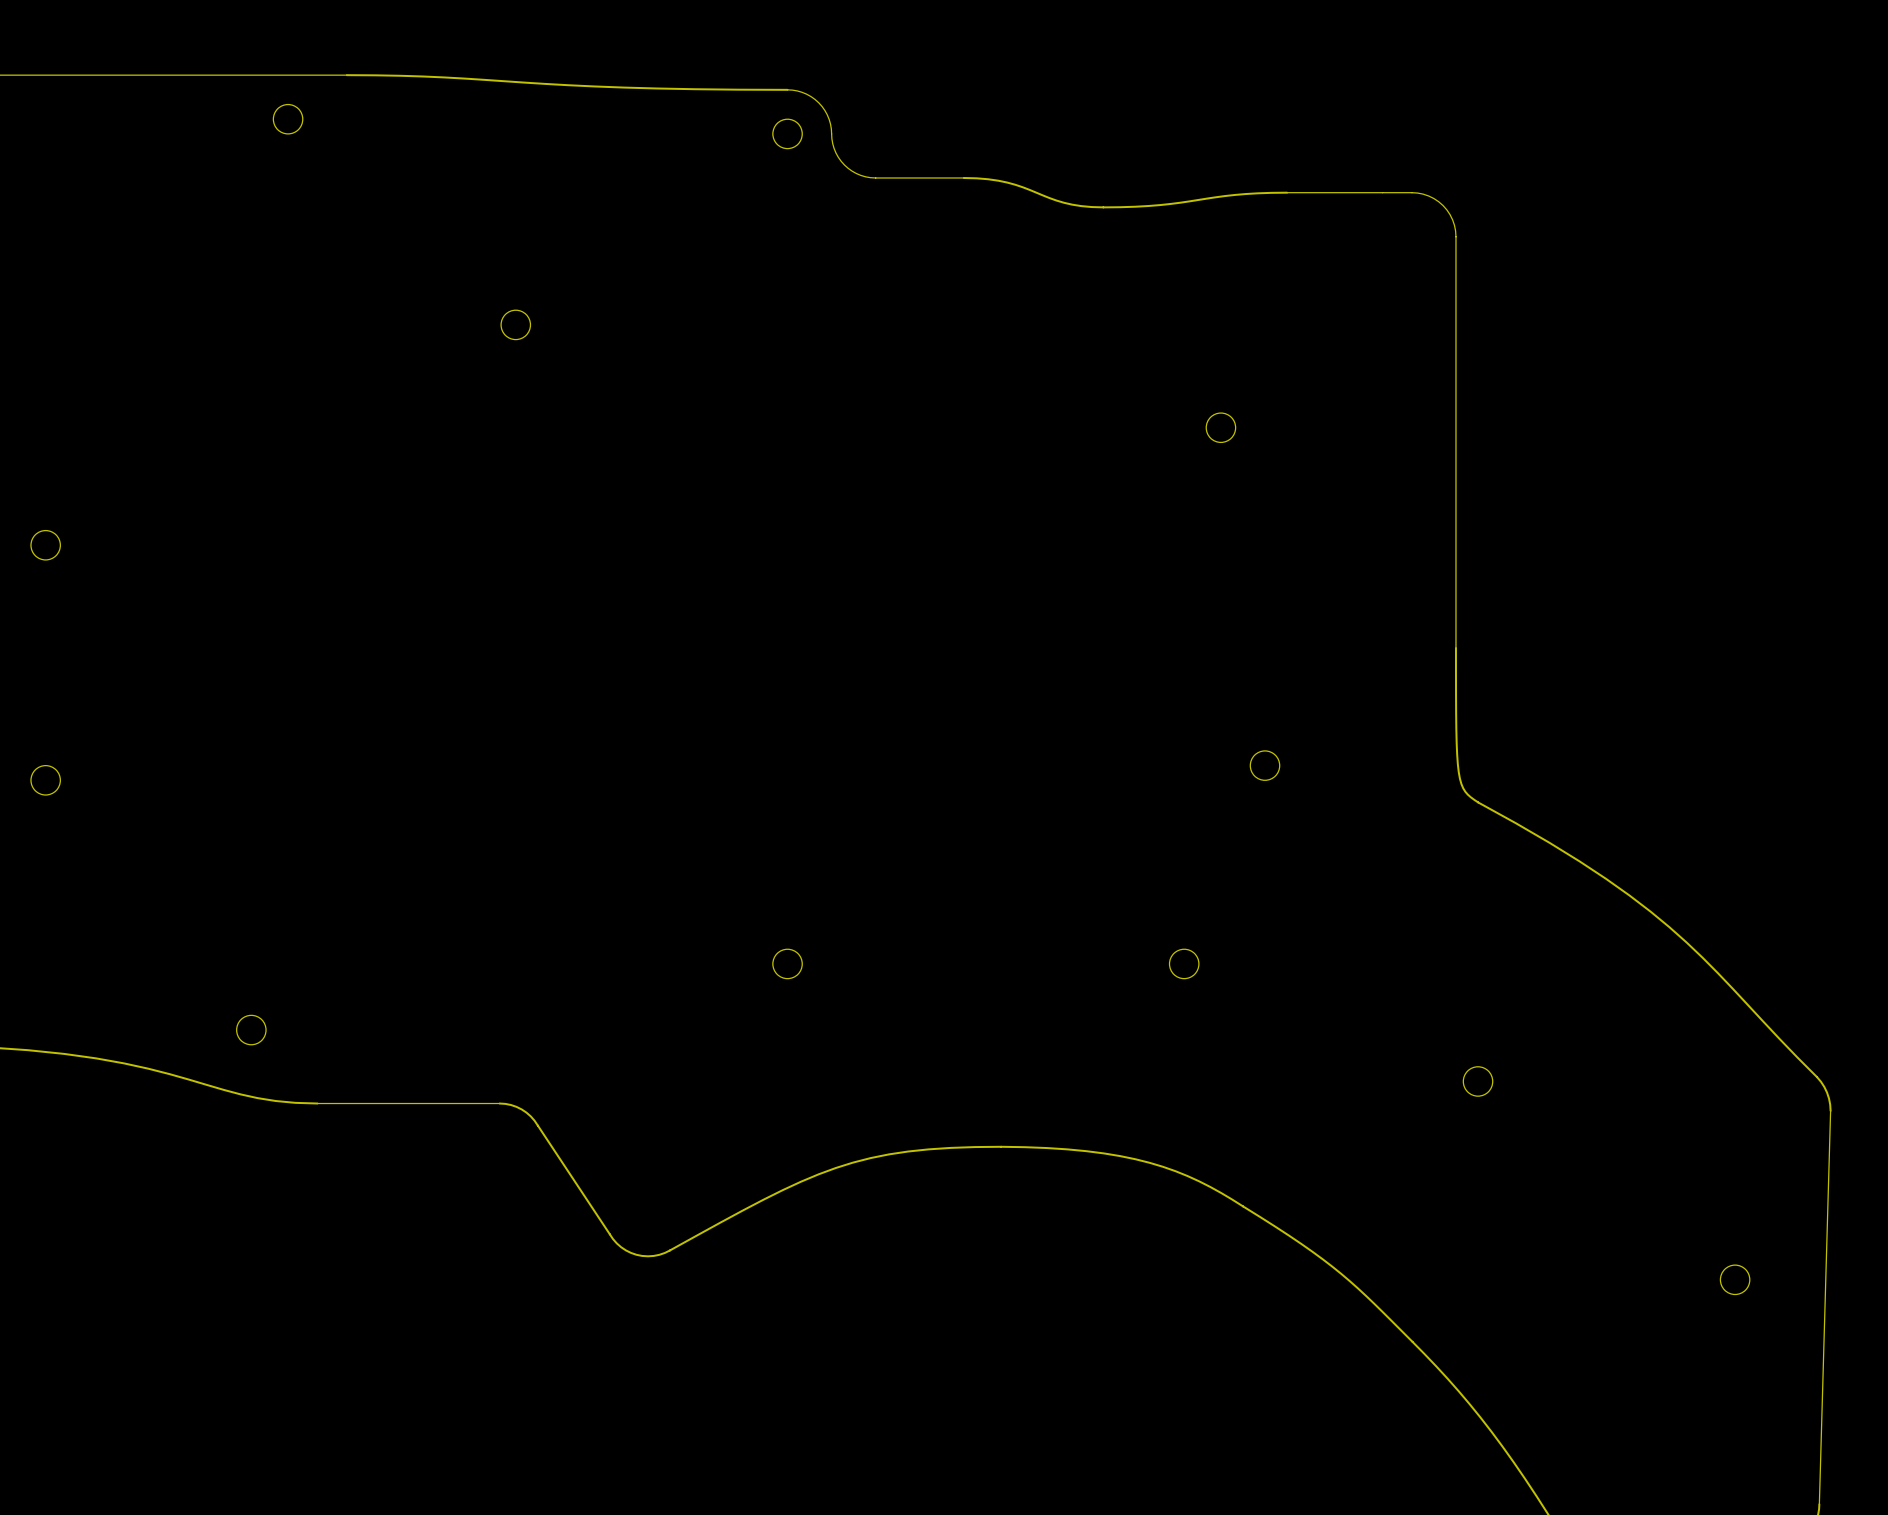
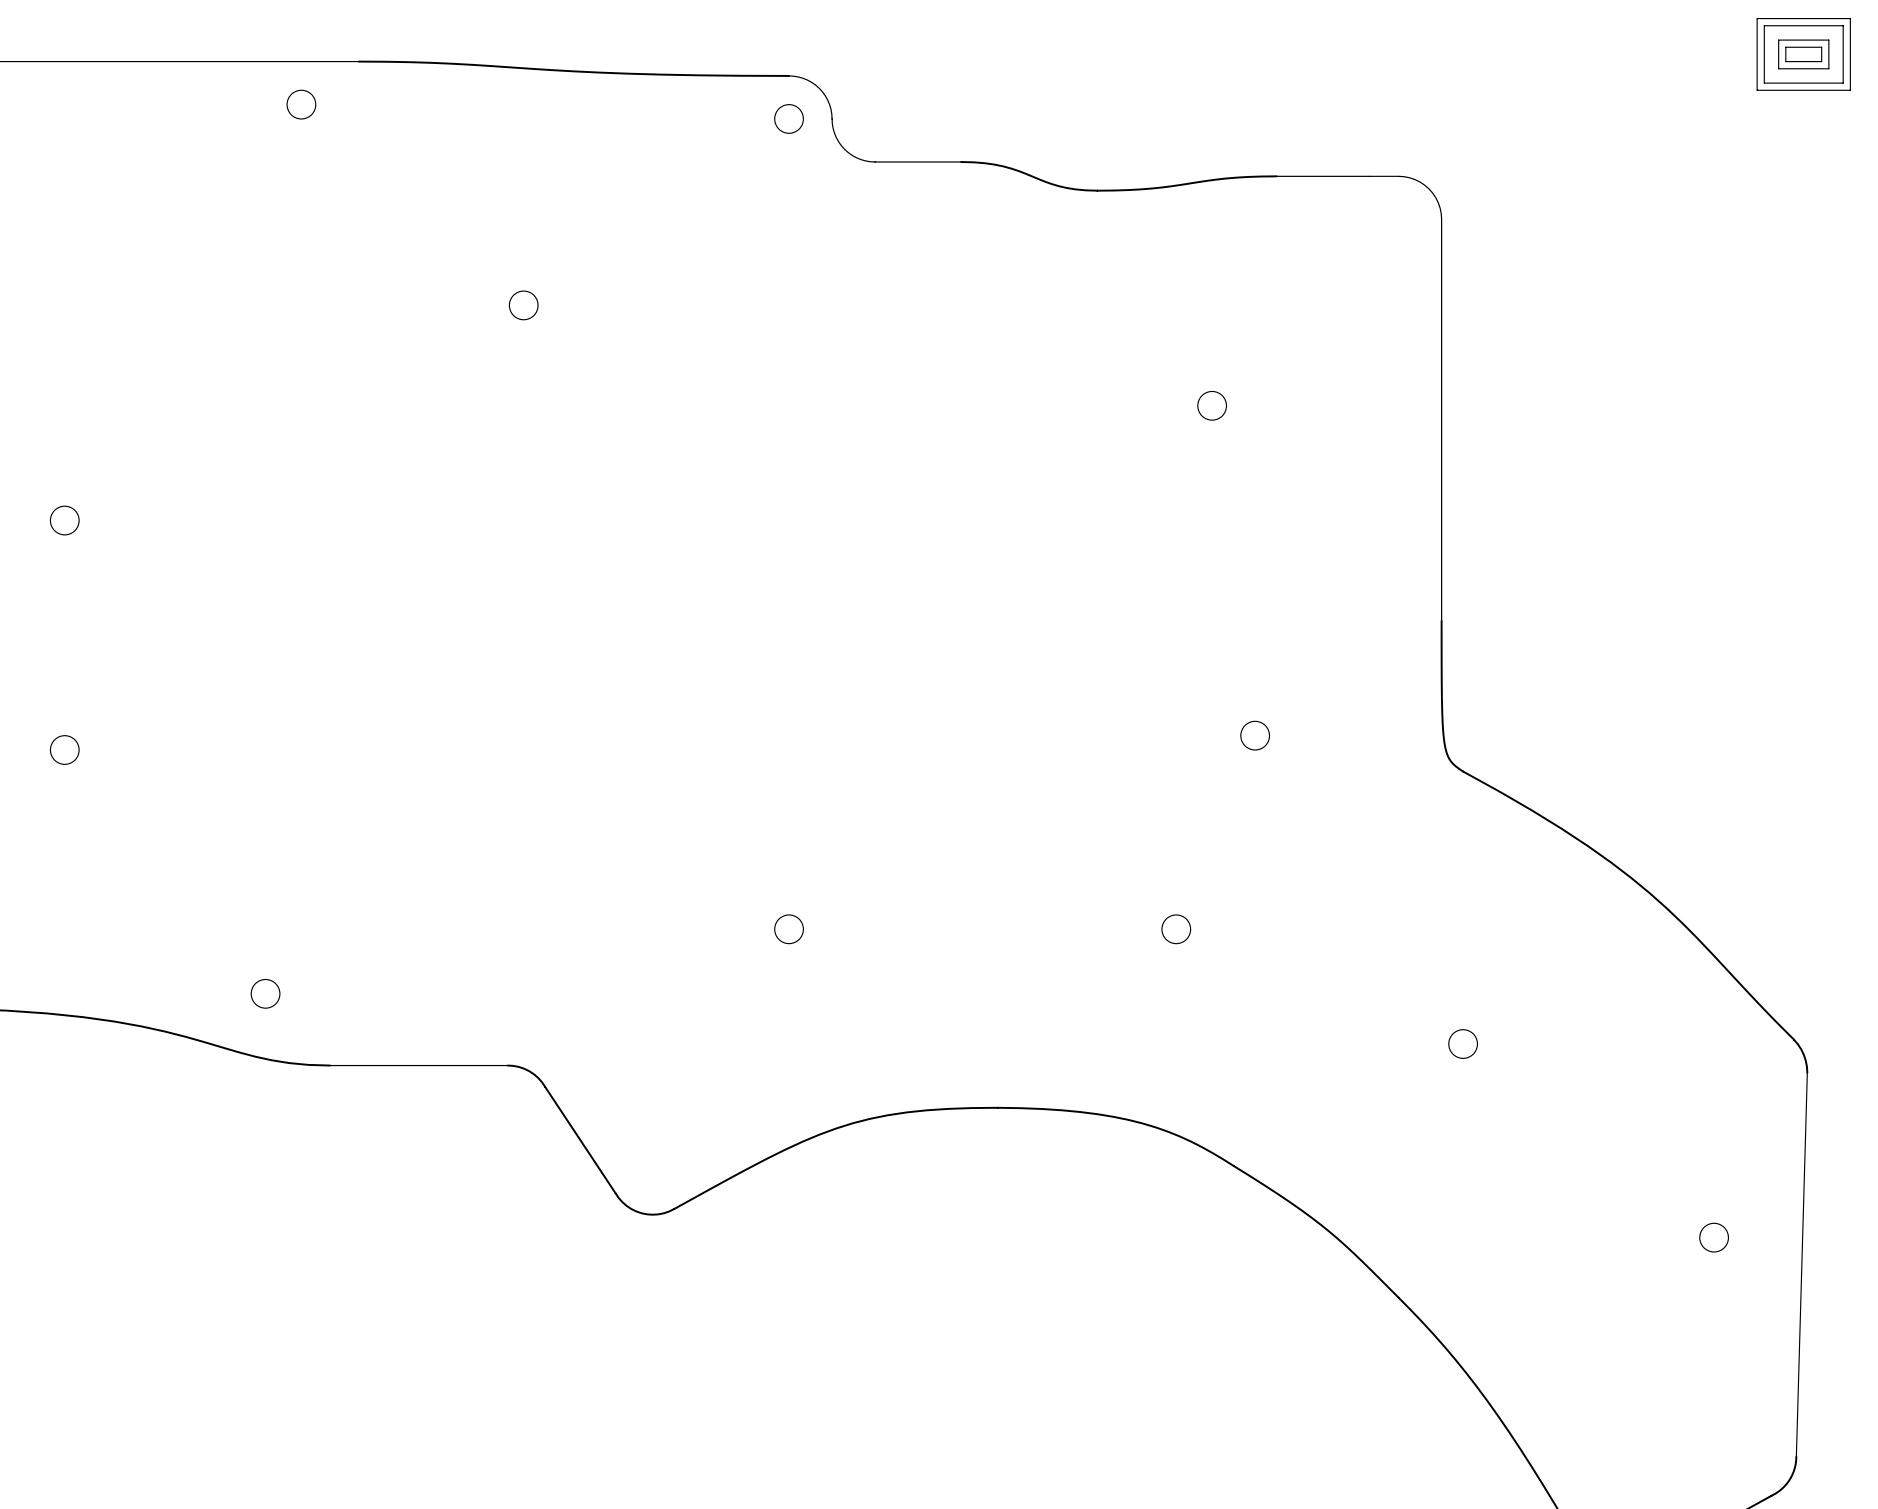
board edge: none -> (1757, 18) (1850, 18) (1850, 90) (1757, 90) (1757, 18)
board edge: none -> (1764, 25) (1843, 25) (1843, 83) (1764, 83) (1764, 25)
board edge: none -> (1778, 40) (1828, 40) (1828, 68) (1778, 68) (1778, 40)
board edge: none -> (1785, 47) (1821, 47) (1821, 61) (1785, 61) (1785, 47)

